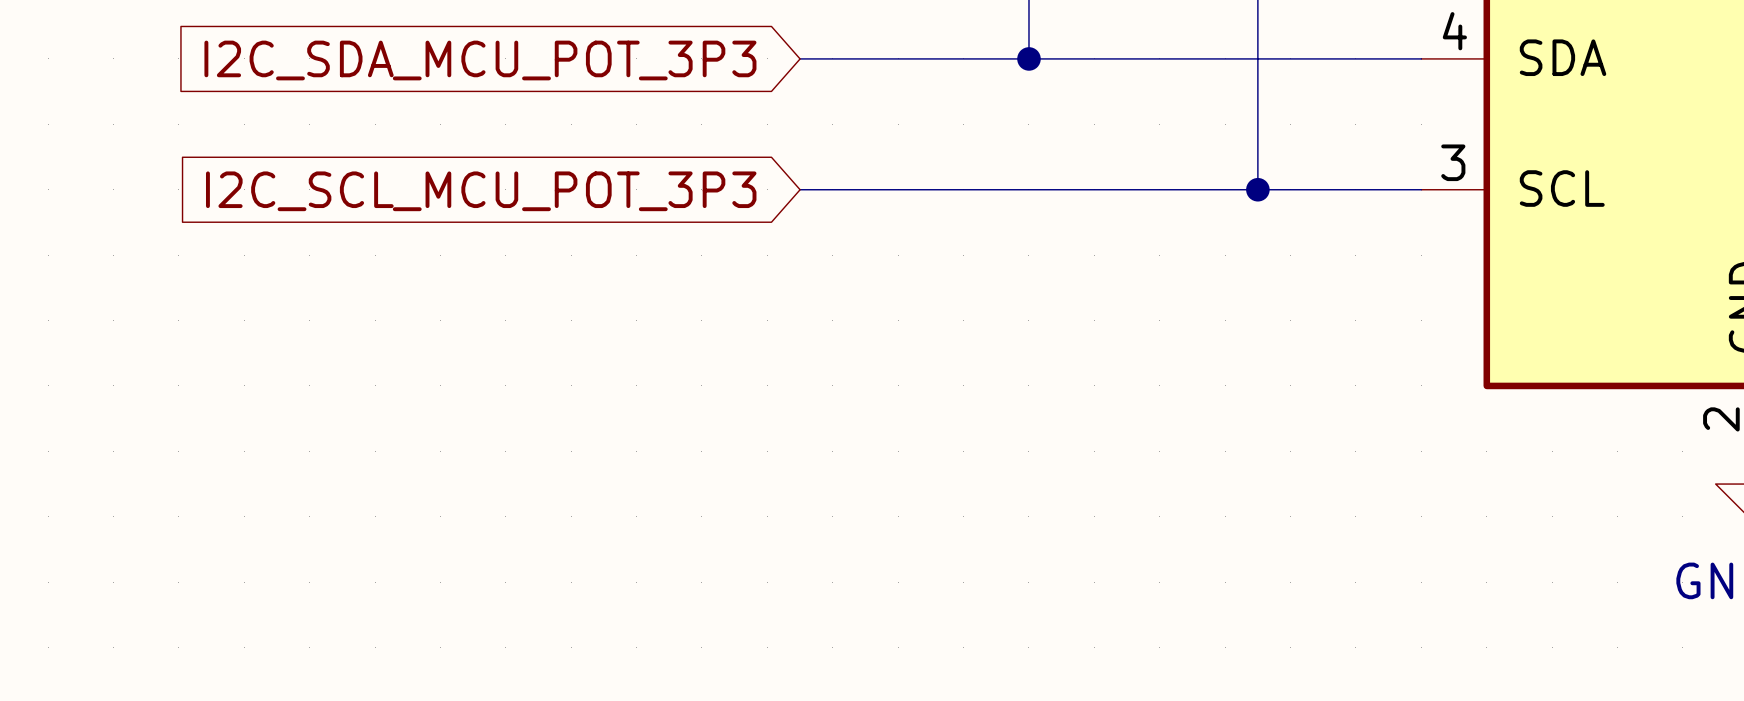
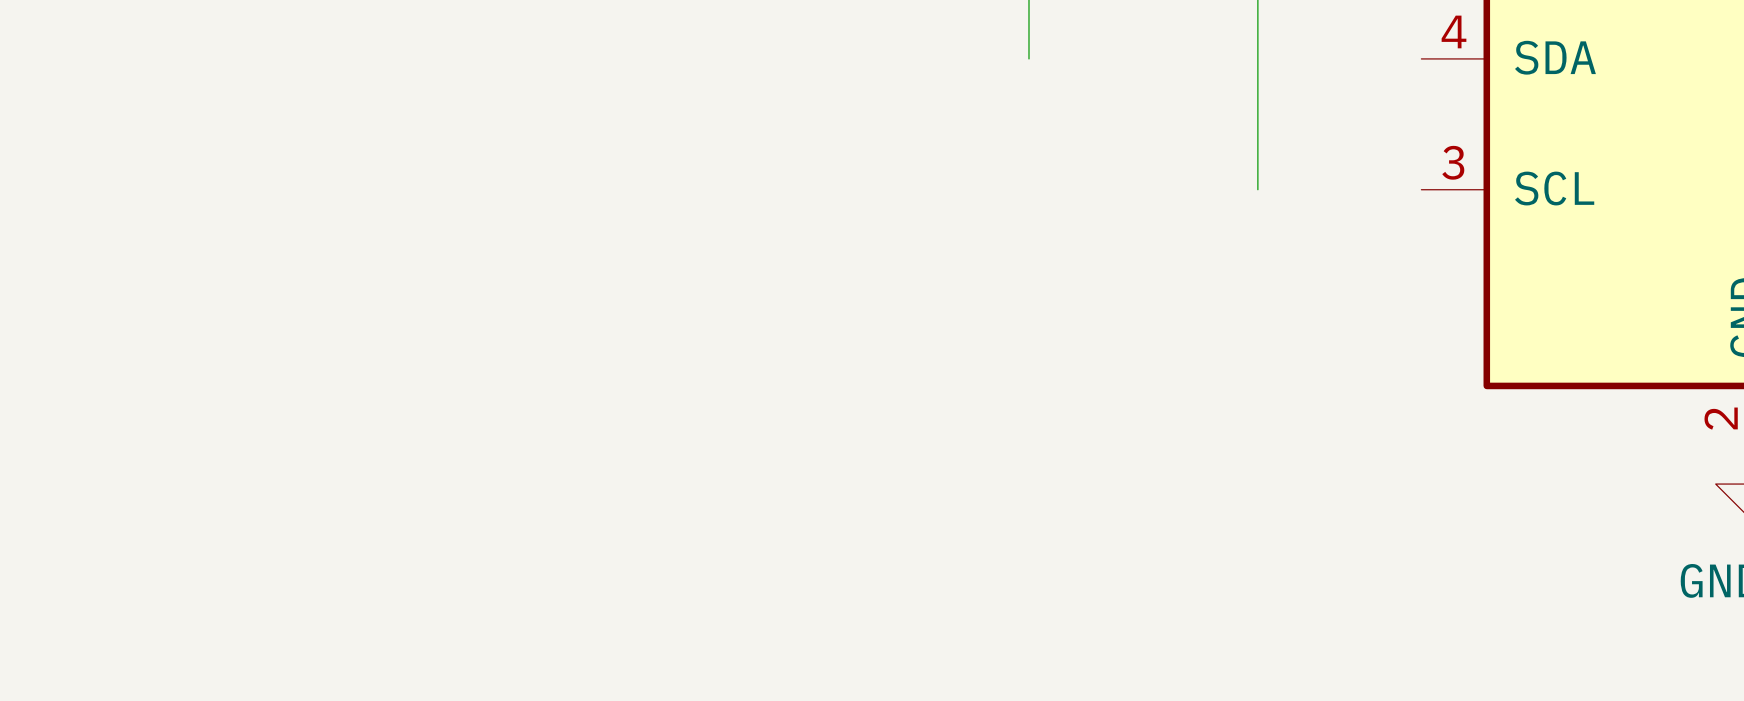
wire: (800, 58) (1421, 58) -> none
junction: (1028, 58) -> none
global label: I2C_SDA_MCU_POT_3P3 (480, 60) -> none
wire: (800, 189) (1421, 189) -> none
junction: (1257, 189) -> none
global label: I2C_SCL_MCU_POT_3P3 (481, 191) -> none

